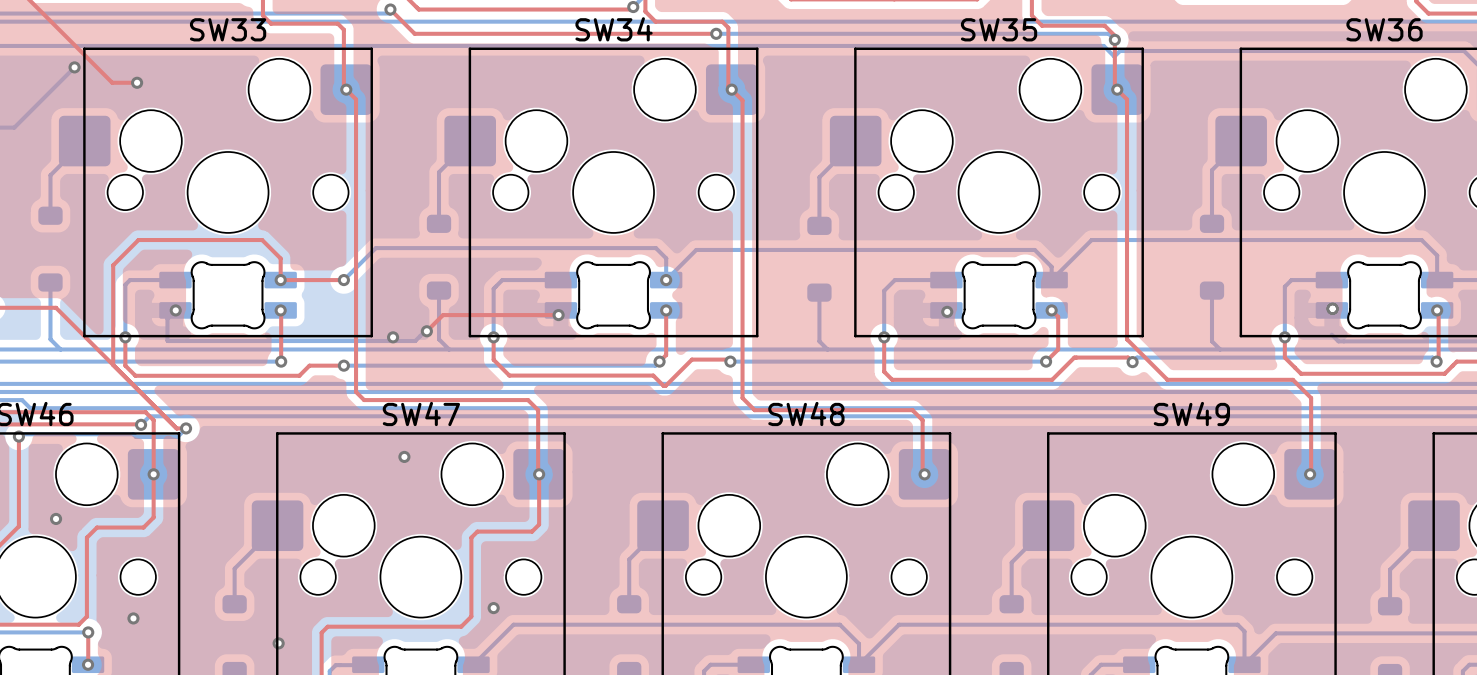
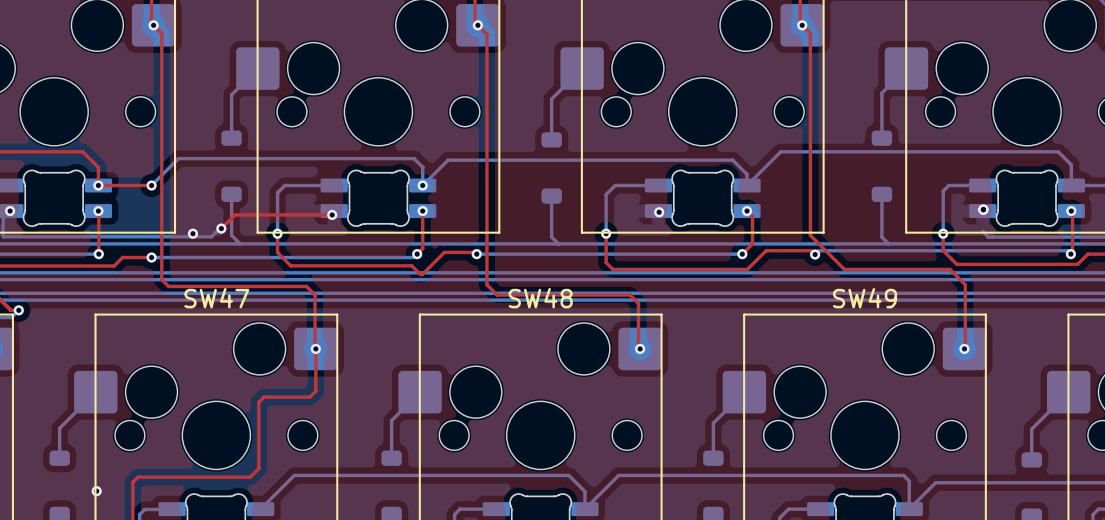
via: (404, 456) -> none
via: (493, 608) -> none

